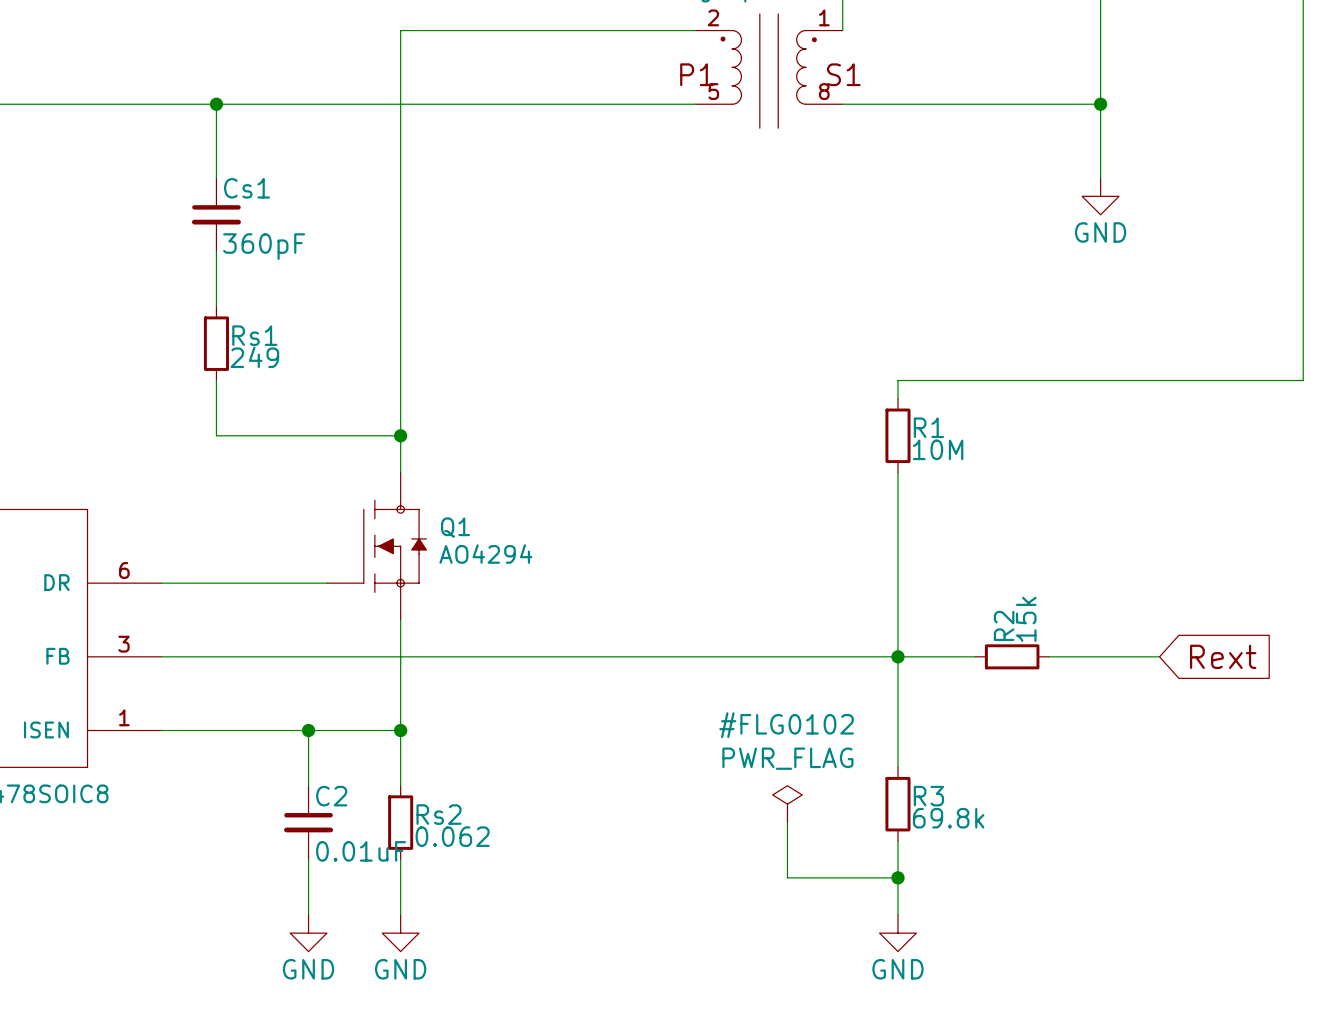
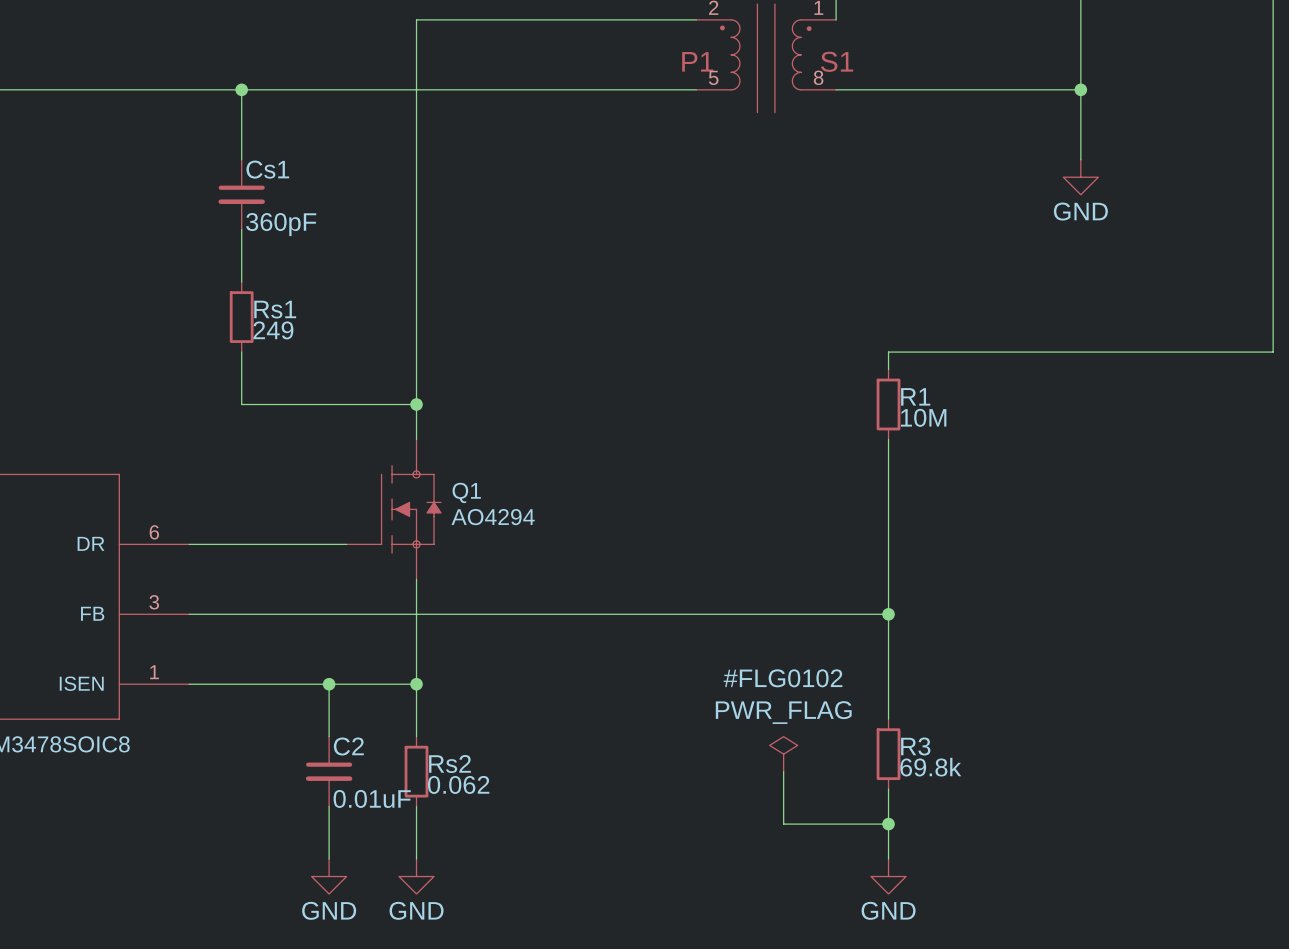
wire: (897, 656) (975, 656) -> none
R2: 15k (1012, 656) -> none
wire: (1049, 656) (1159, 656) -> none
global label: Rext (1223, 656) -> none

